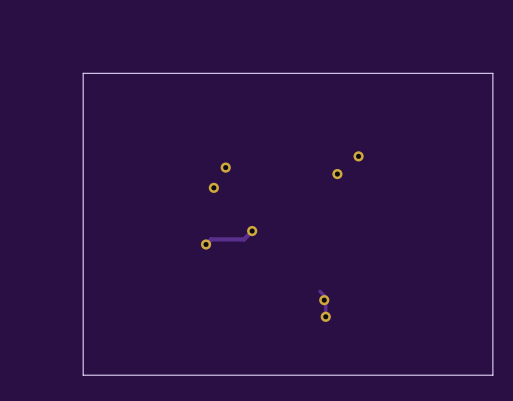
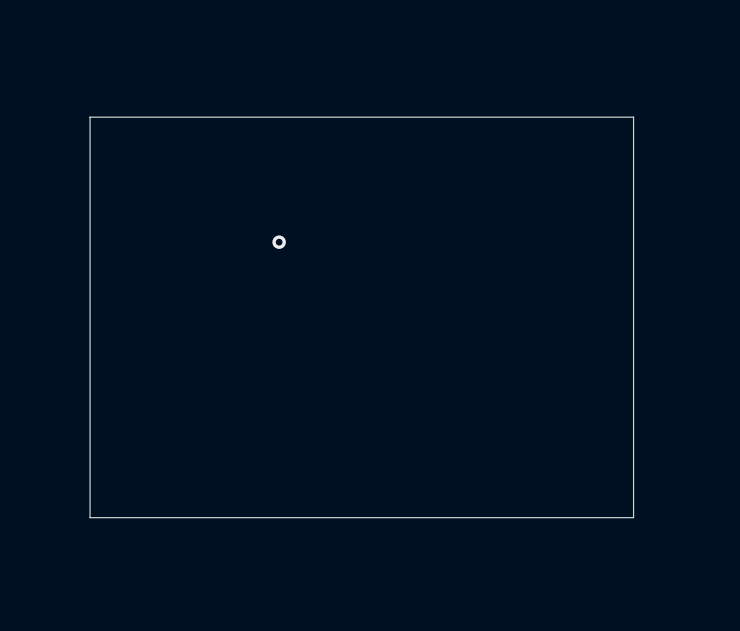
via: (358, 156) -> none
via: (337, 174) -> none
via: (213, 187) -> none
track: (252, 231) (244, 239) (211, 239) (206, 244) -> none
via: (252, 231) -> none
via: (206, 244) -> none
track: (319, 291) (325, 297) (325, 316) -> none
via: (324, 300) -> none
via: (325, 316) -> none

